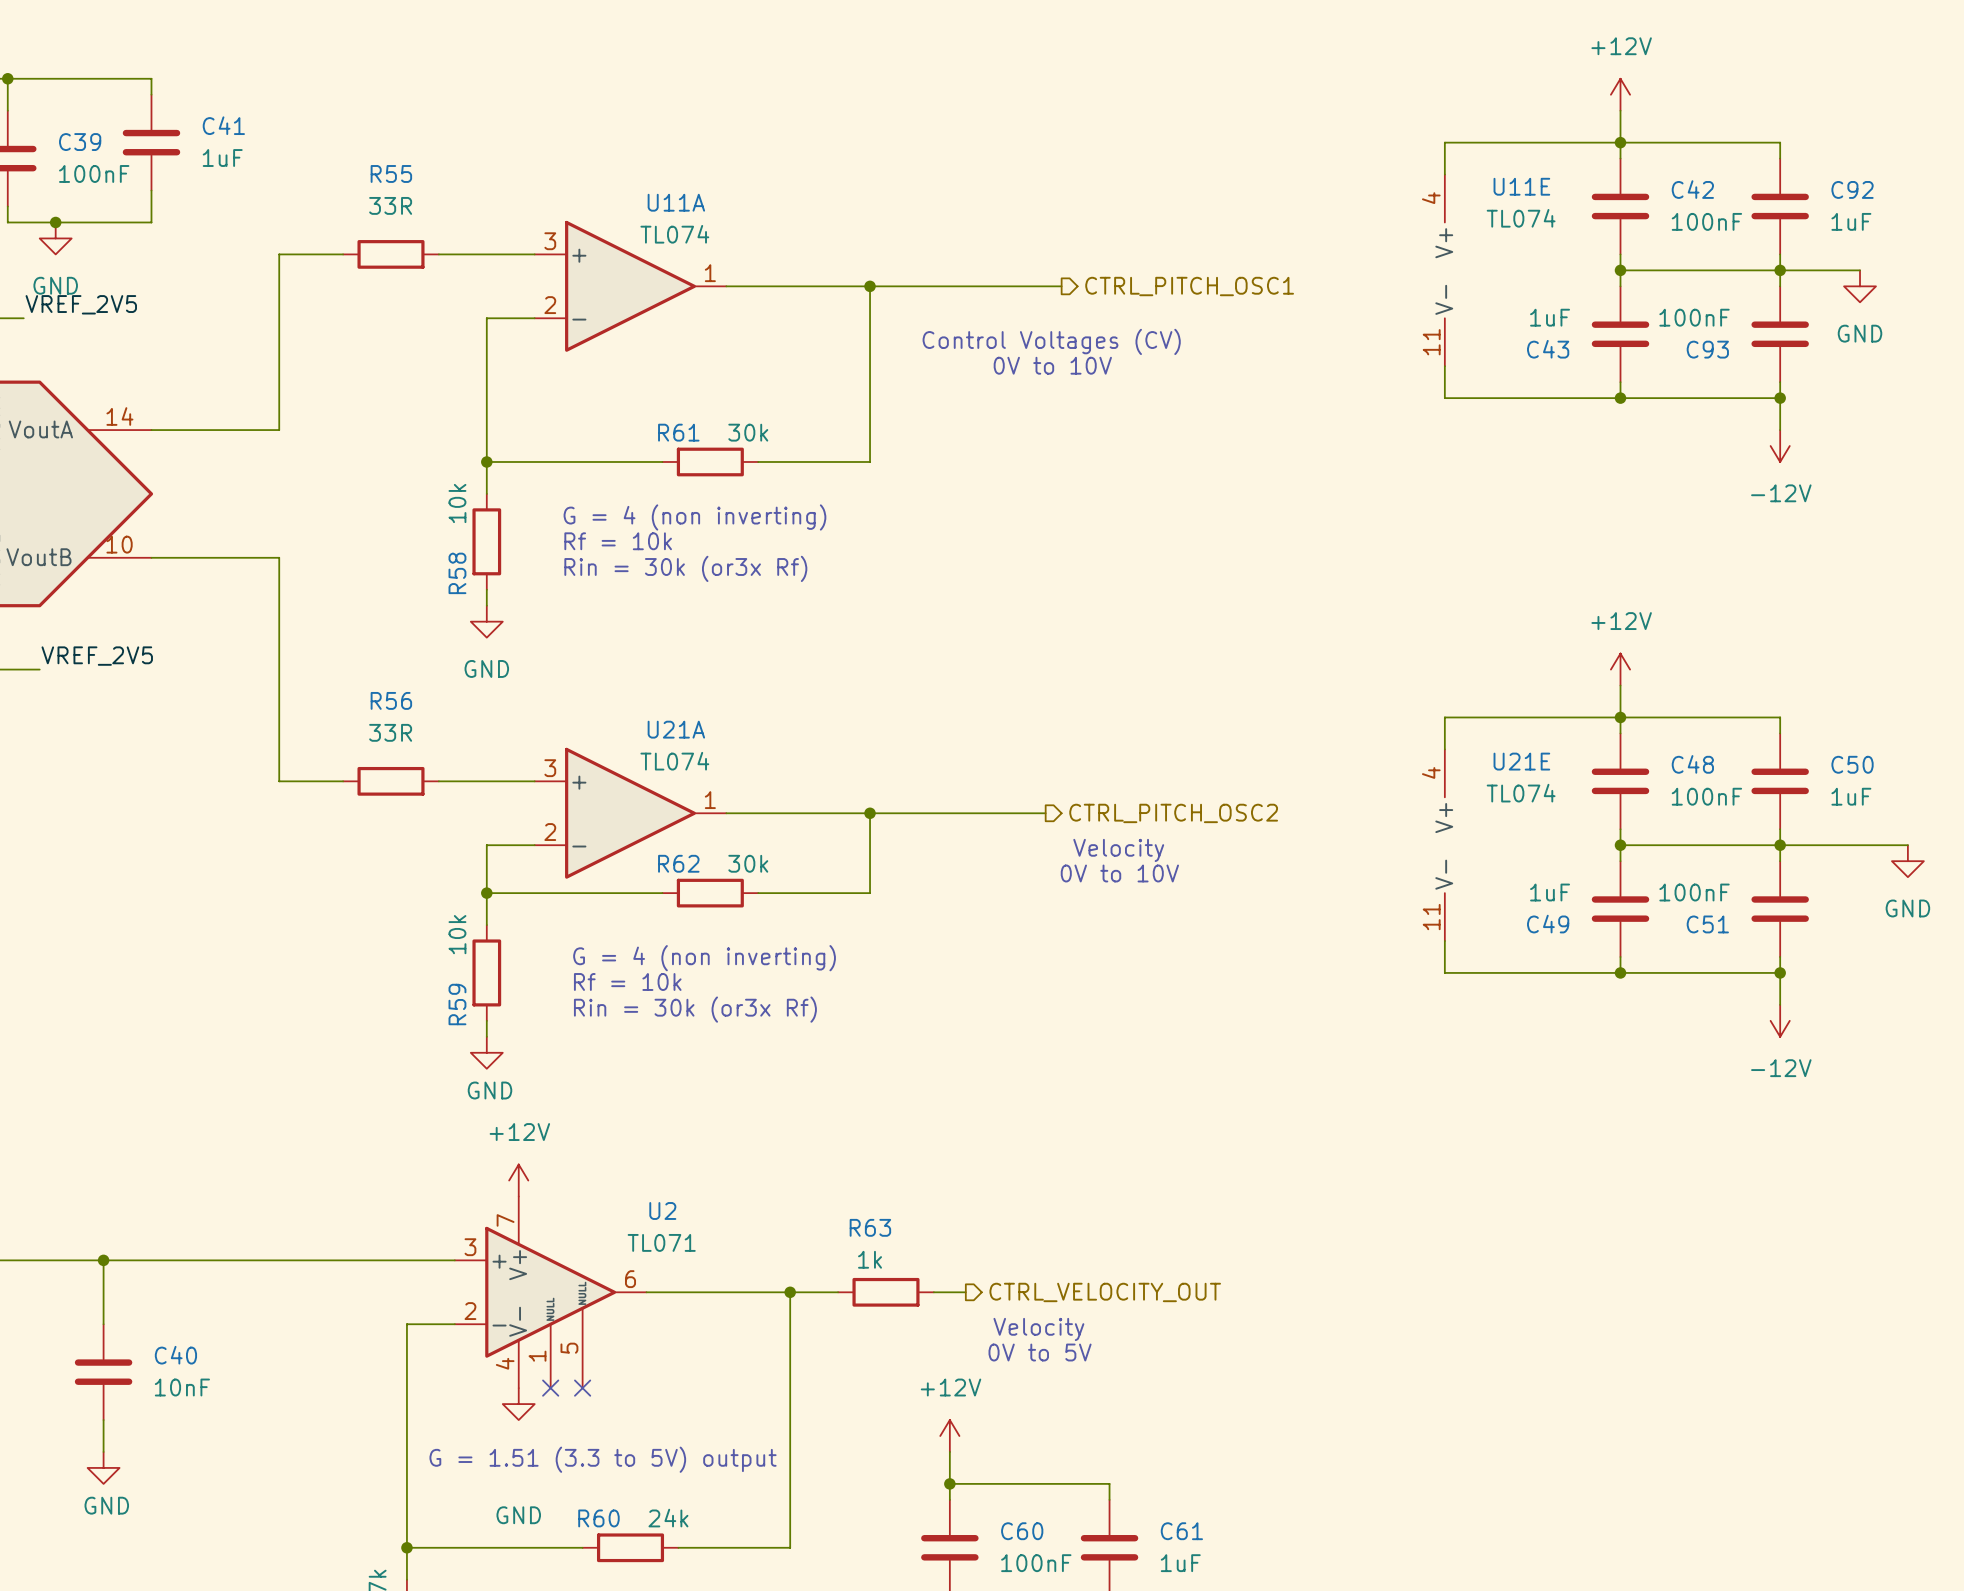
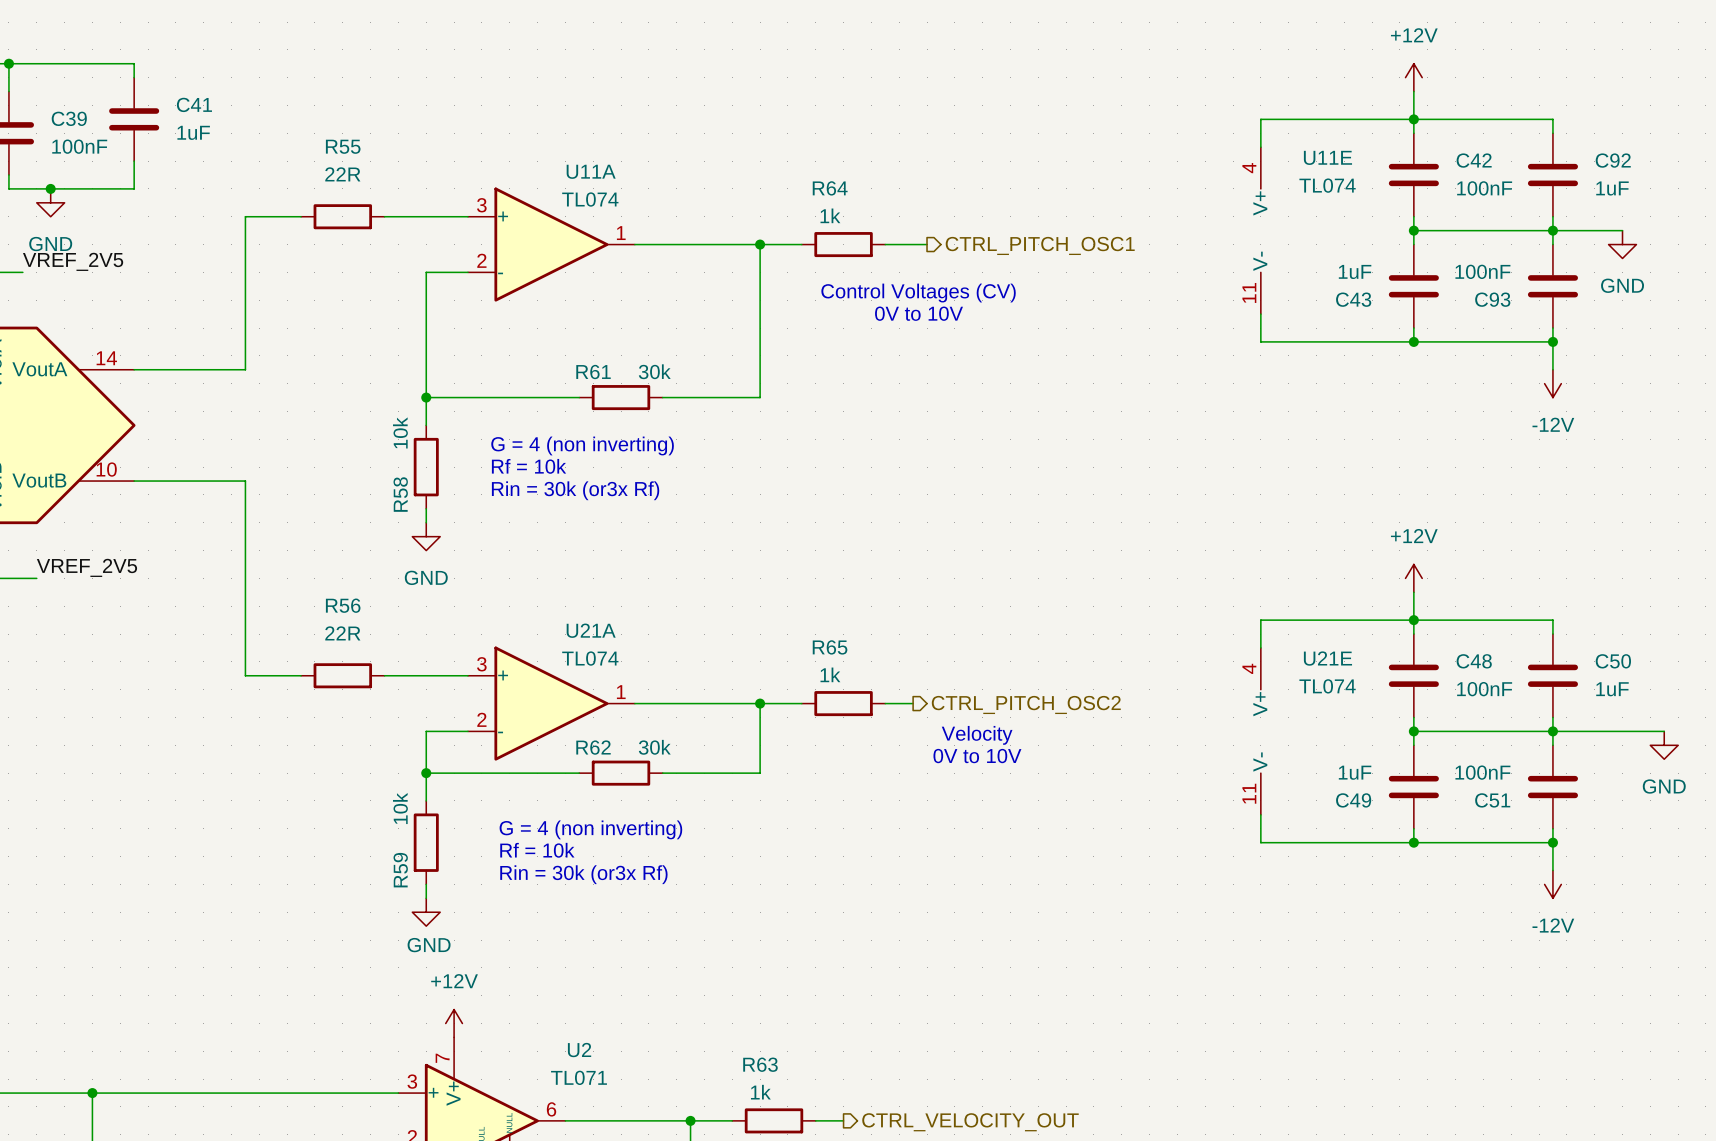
R55 value: 33R (390, 205) -> 22R (342, 174)
wire: (917, 286) (1013, 286) -> none
R64: none -> 1k (843, 244)
R56 value: 33R (390, 732) -> 22R (342, 633)
wire: (917, 813) (1013, 813) -> none
R65: none -> 1k (843, 703)

